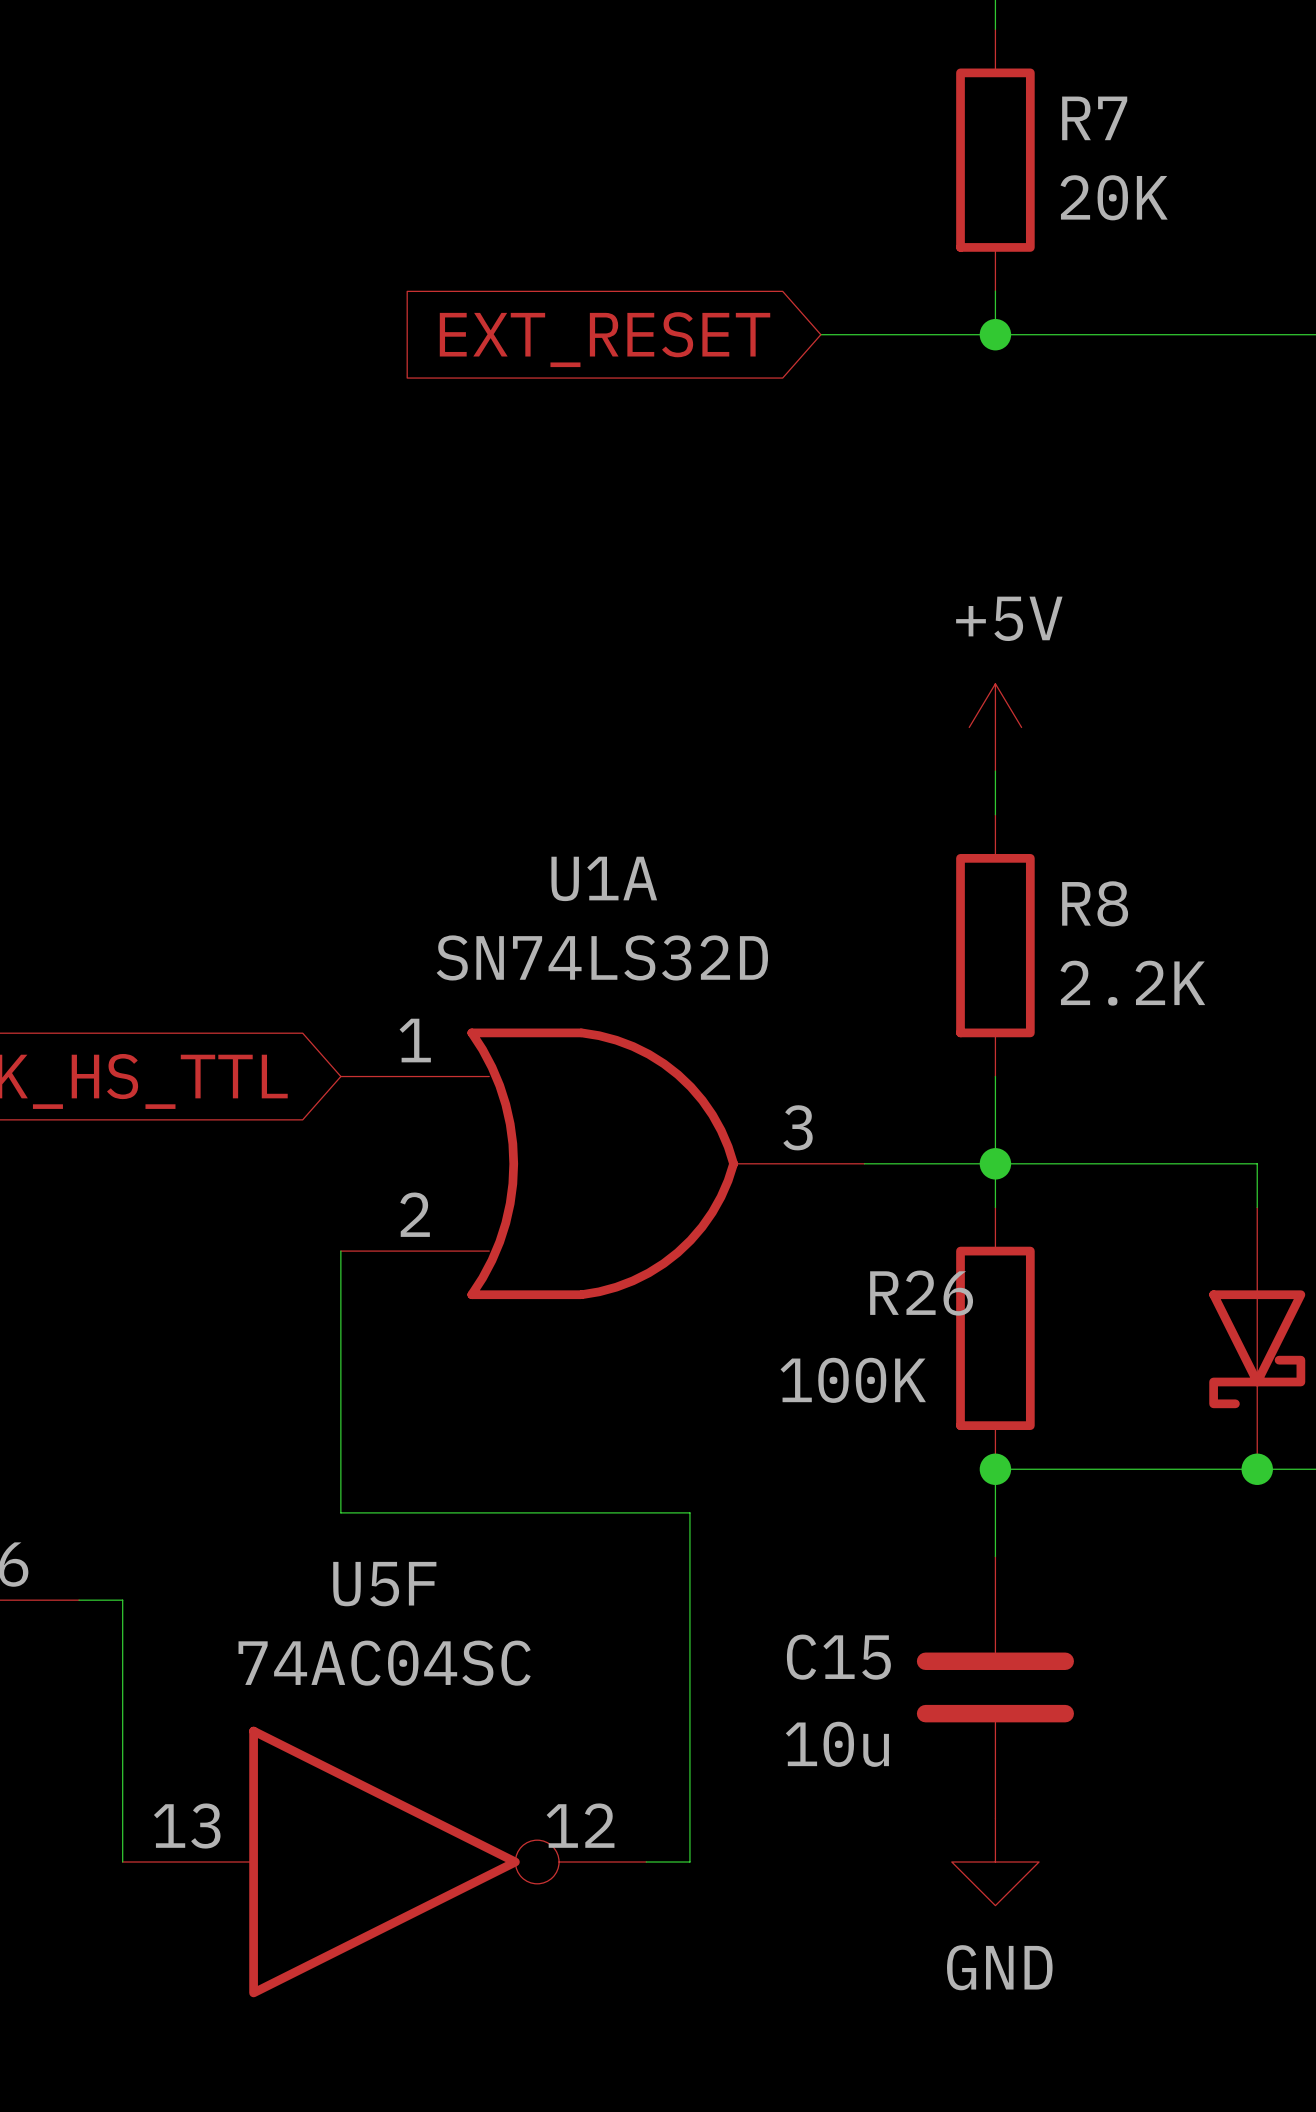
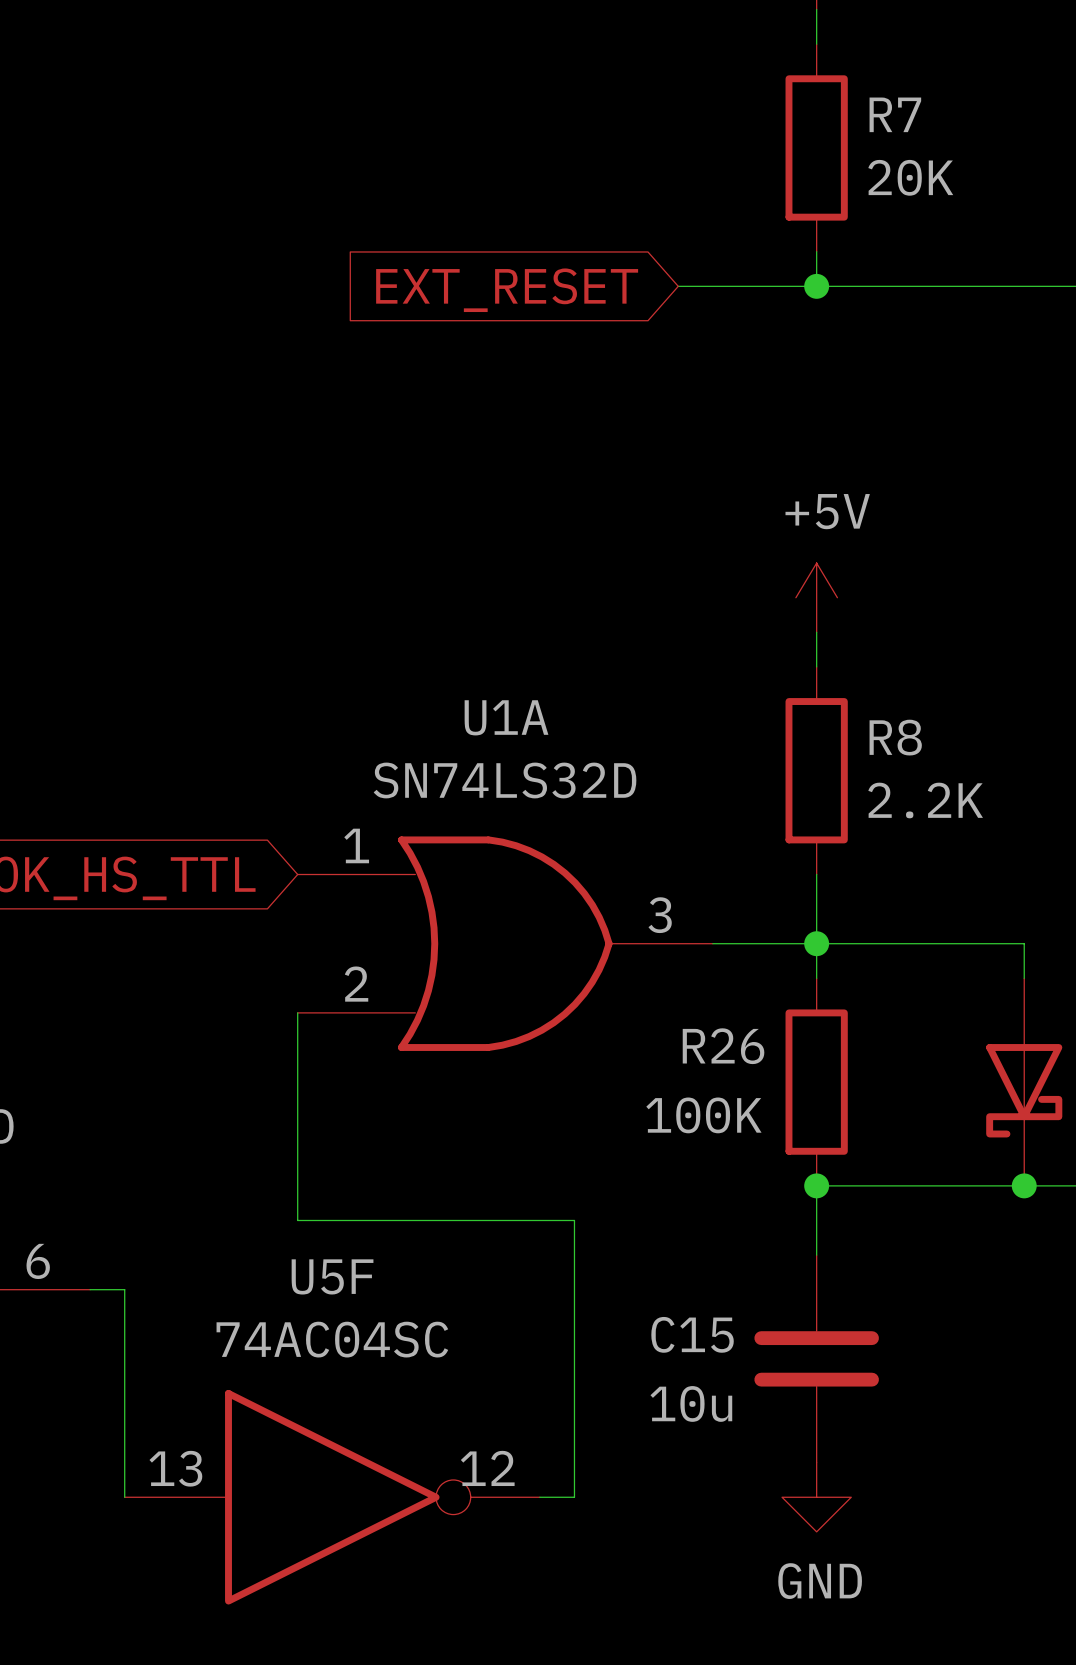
R26 name position: R26 (921, 1293) -> R26 (723, 1046)

